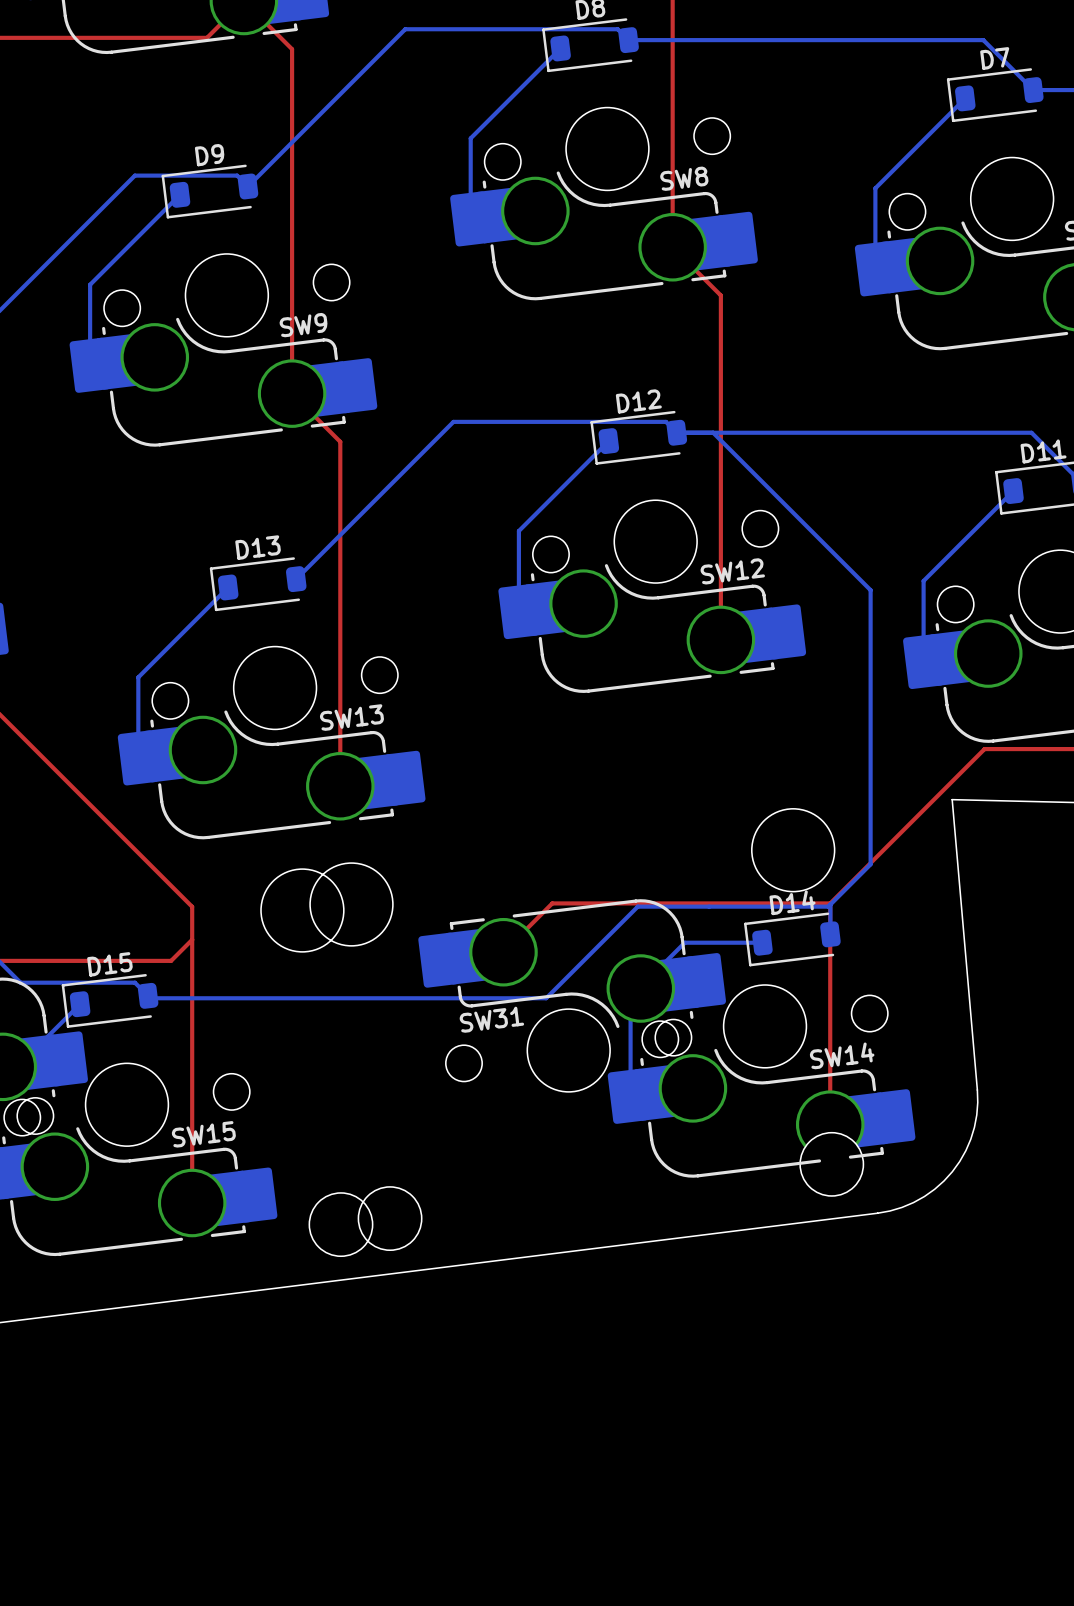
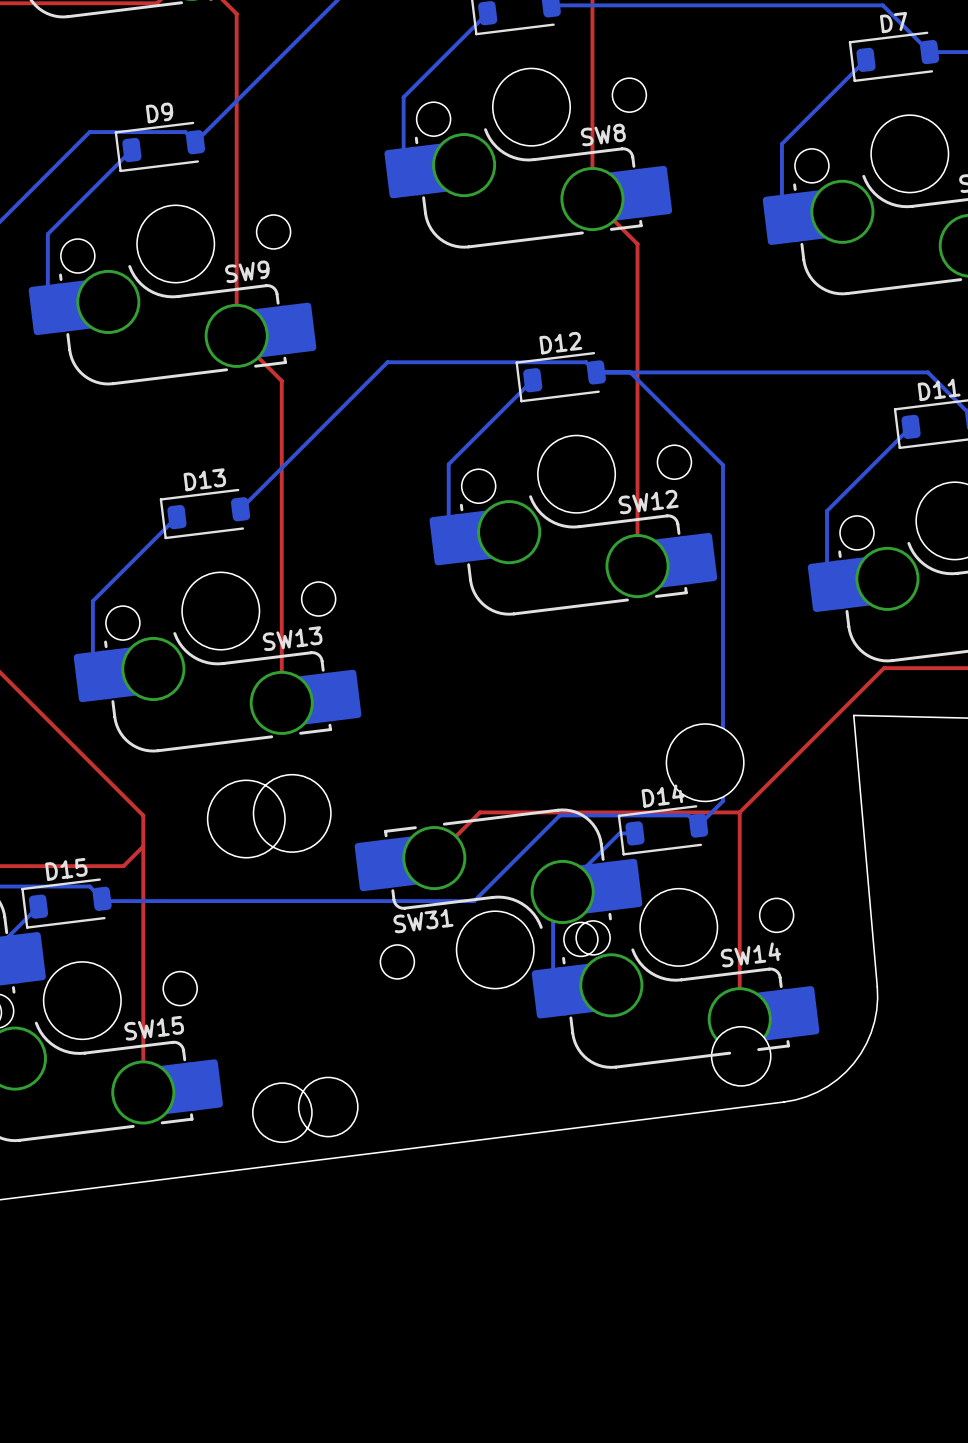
bottom track: (812, 531) (870, 590) (870, 864) (828, 906) (775, 906) -> (723, 465) (723, 801) (698, 825) (688, 815)
bottom track: (830, 904) (830, 934) -> none
D14 position: (792, 939) -> (662, 830)
bottom track: (762, 942) (684, 942) -> (634, 833) (619, 833) (603, 849)

